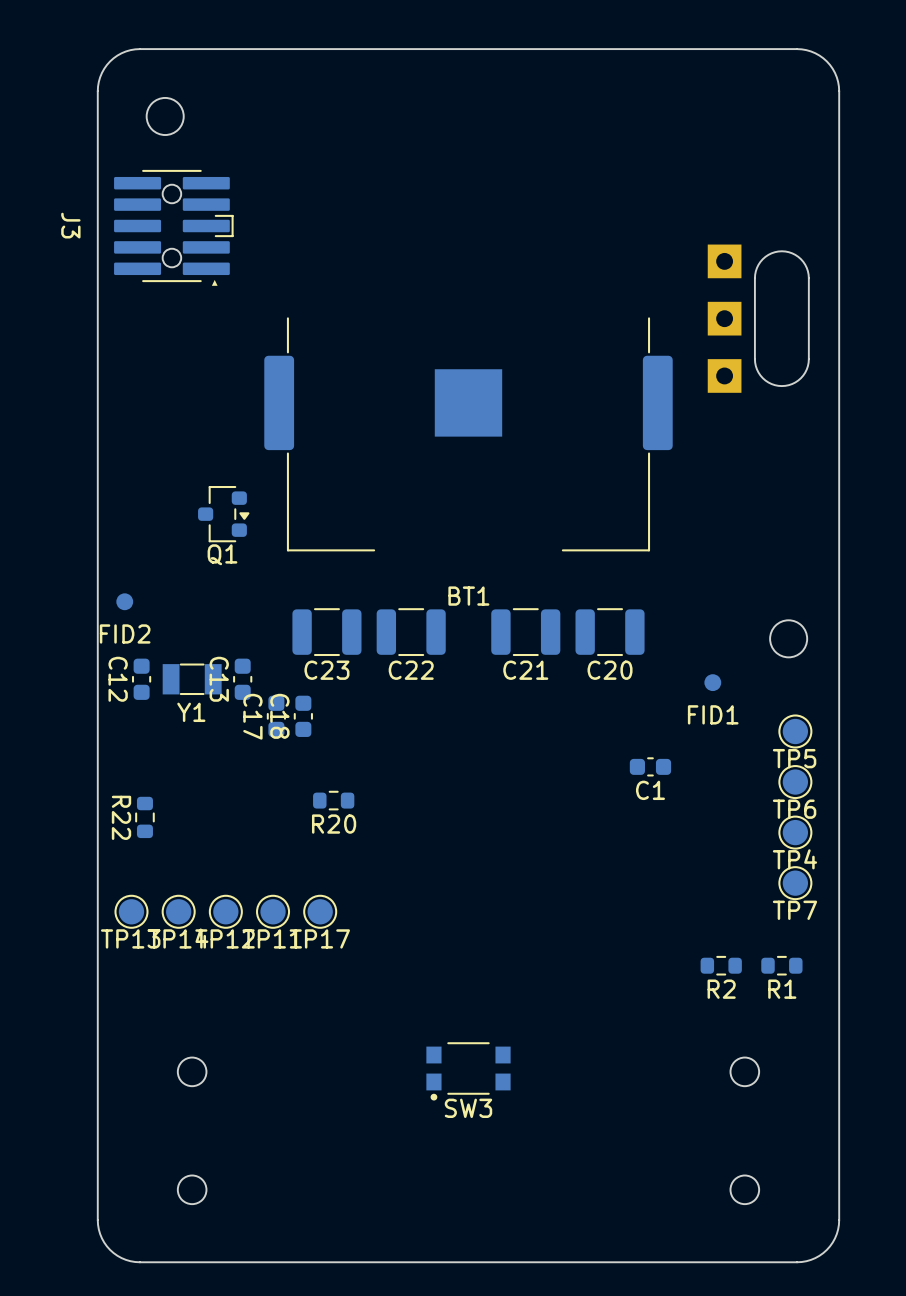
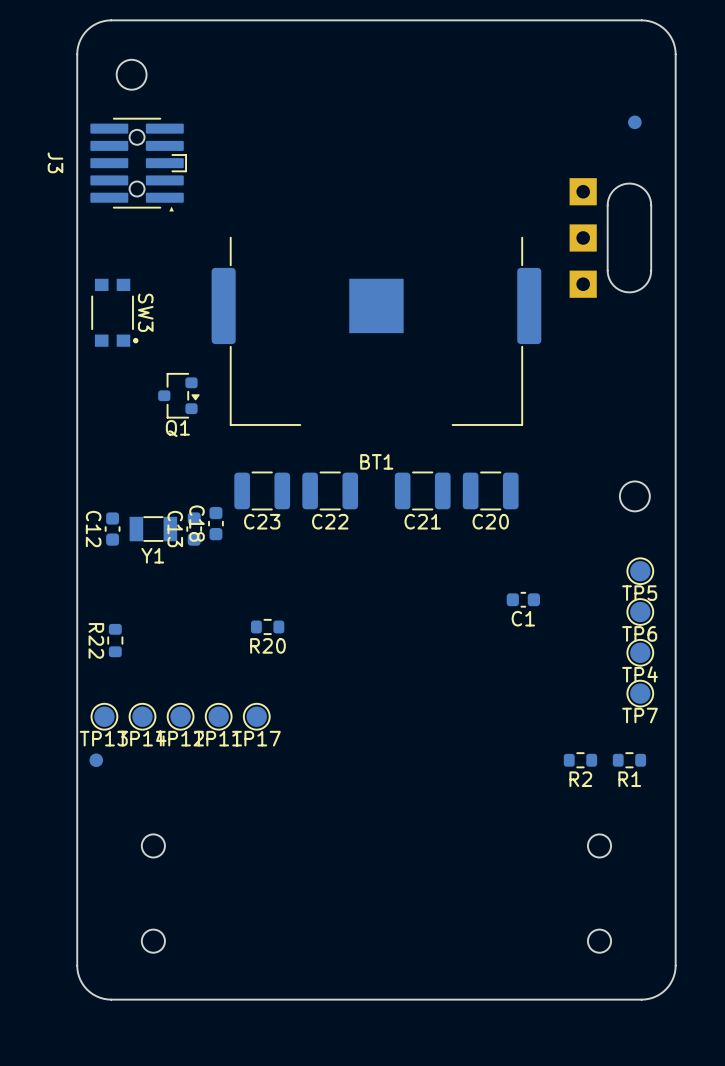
part: none -> (634, 122)
FID2: (124, 601) -> none
FID1: (712, 682) -> none
C17: (276, 716) -> none
C18 position: (303, 716) -> (215, 523)
part: none -> (96, 760)
SW3 rotation: 0° (468, 1071) -> 90° counterclockwise (114, 312)
SW3 position: (468, 1071) -> (114, 312)

